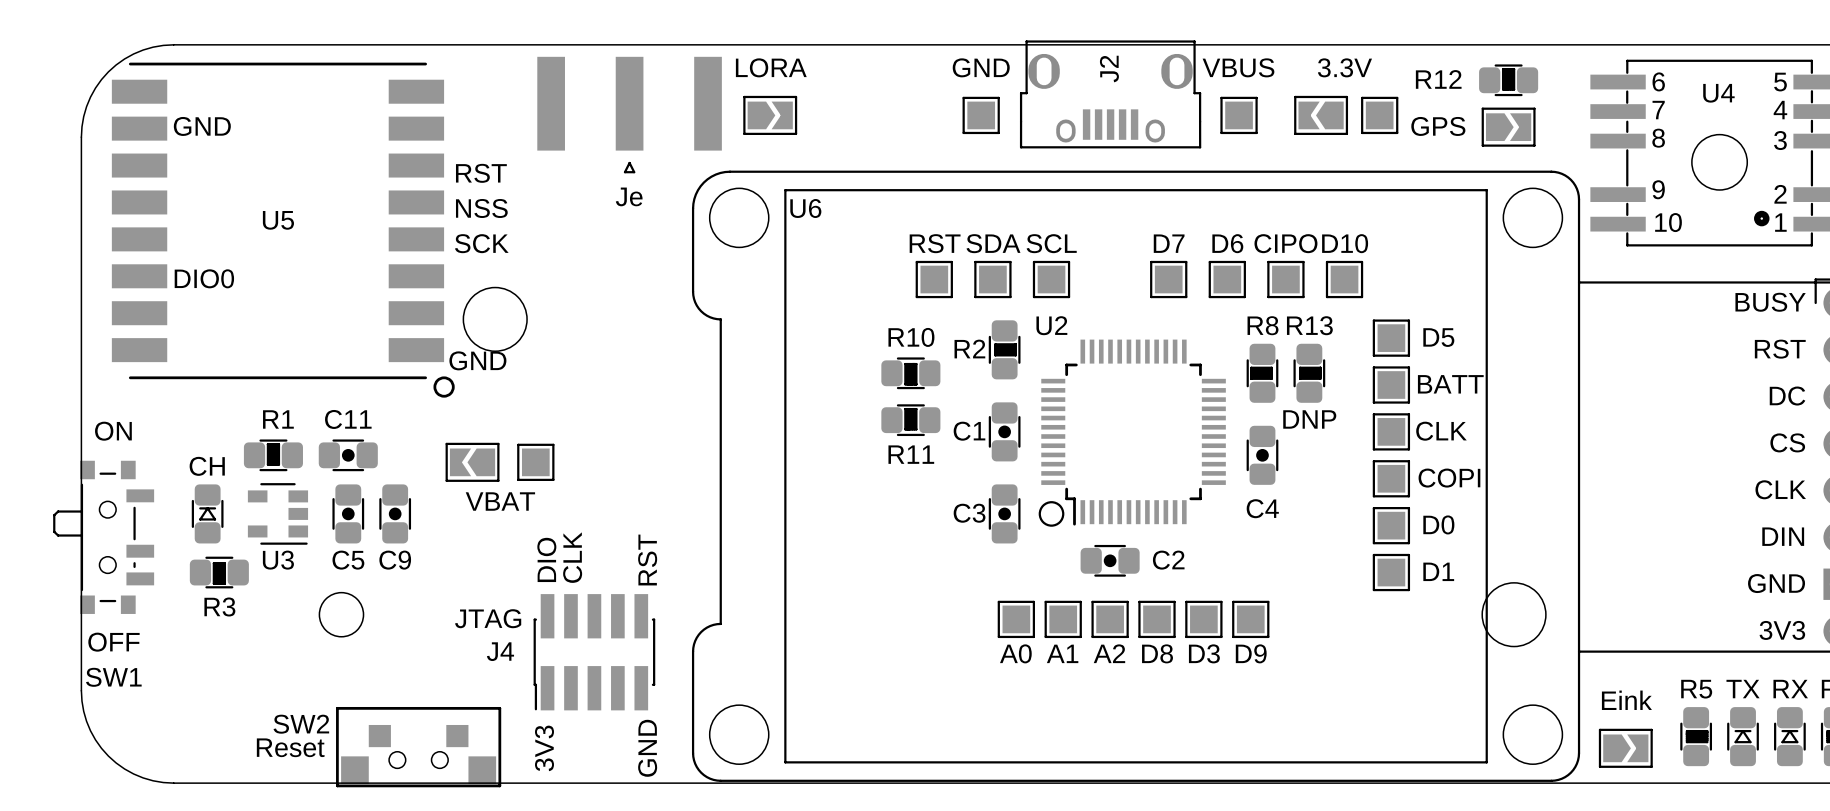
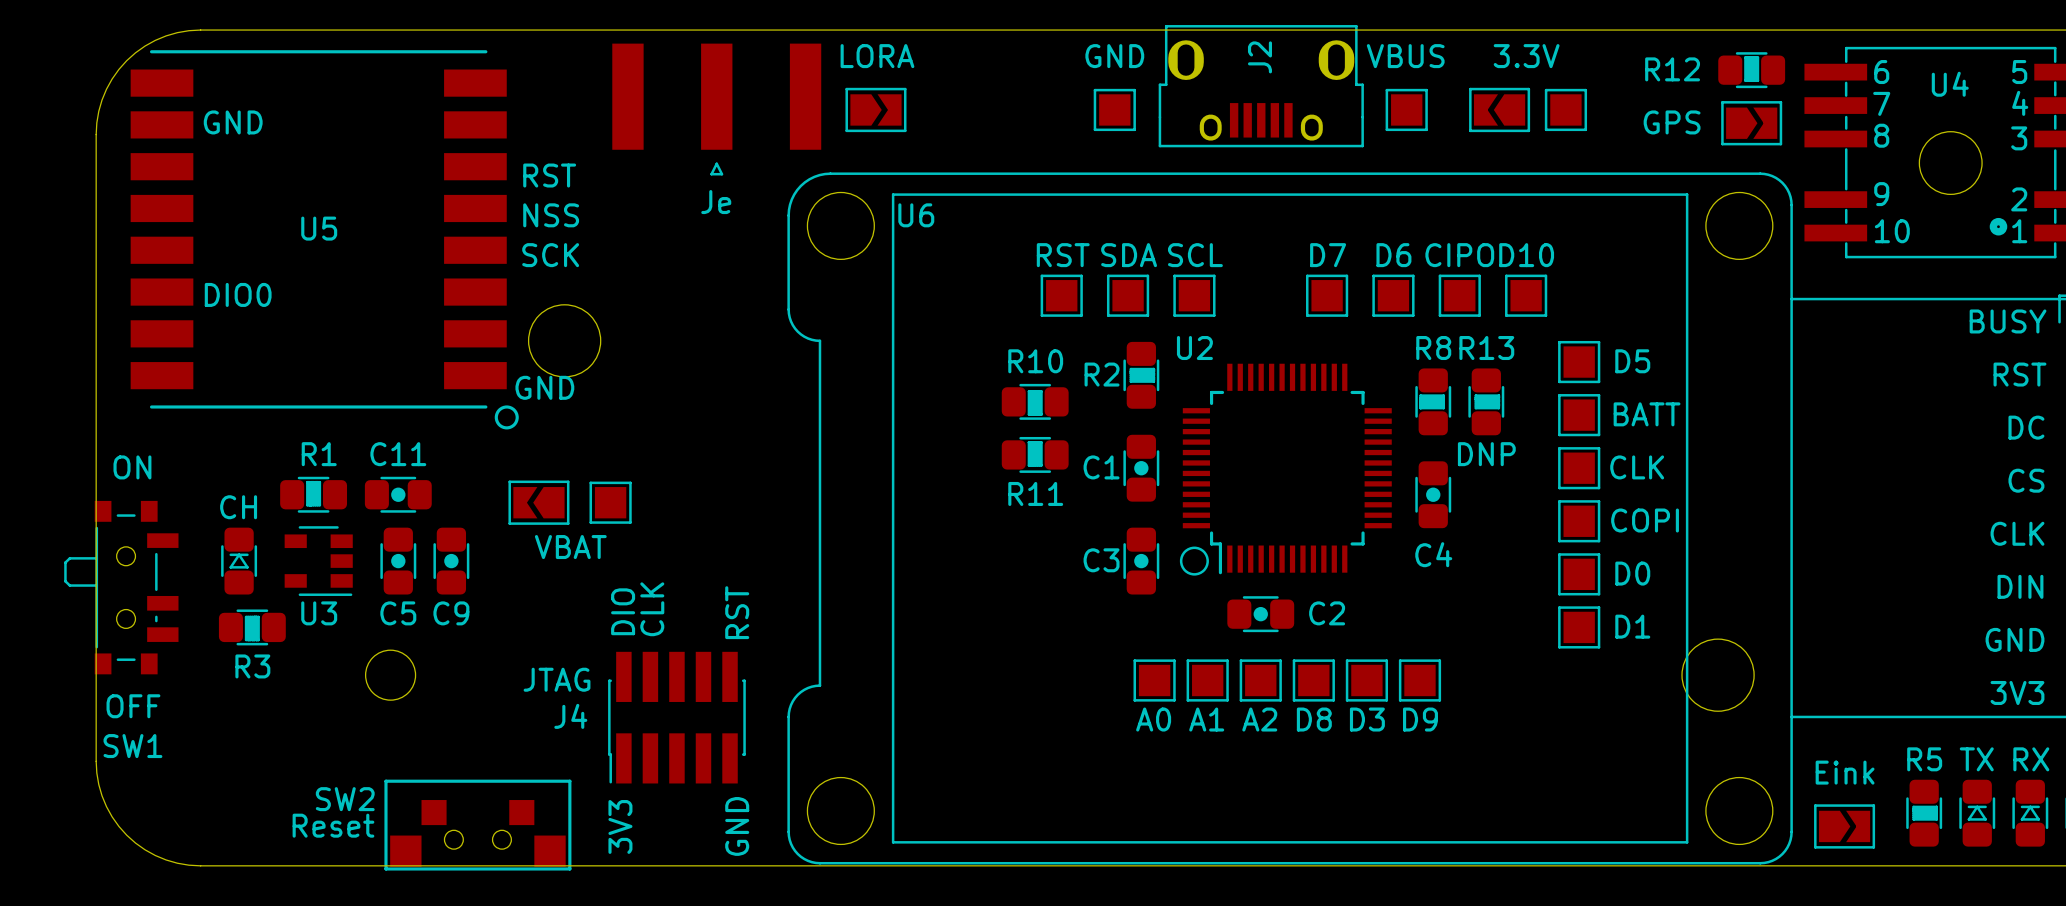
R12 position: (1508, 80) -> (1751, 70)
text position: GPS (1438, 126) -> GPS (1672, 122)
part position: (1508, 127) -> (1751, 123)

